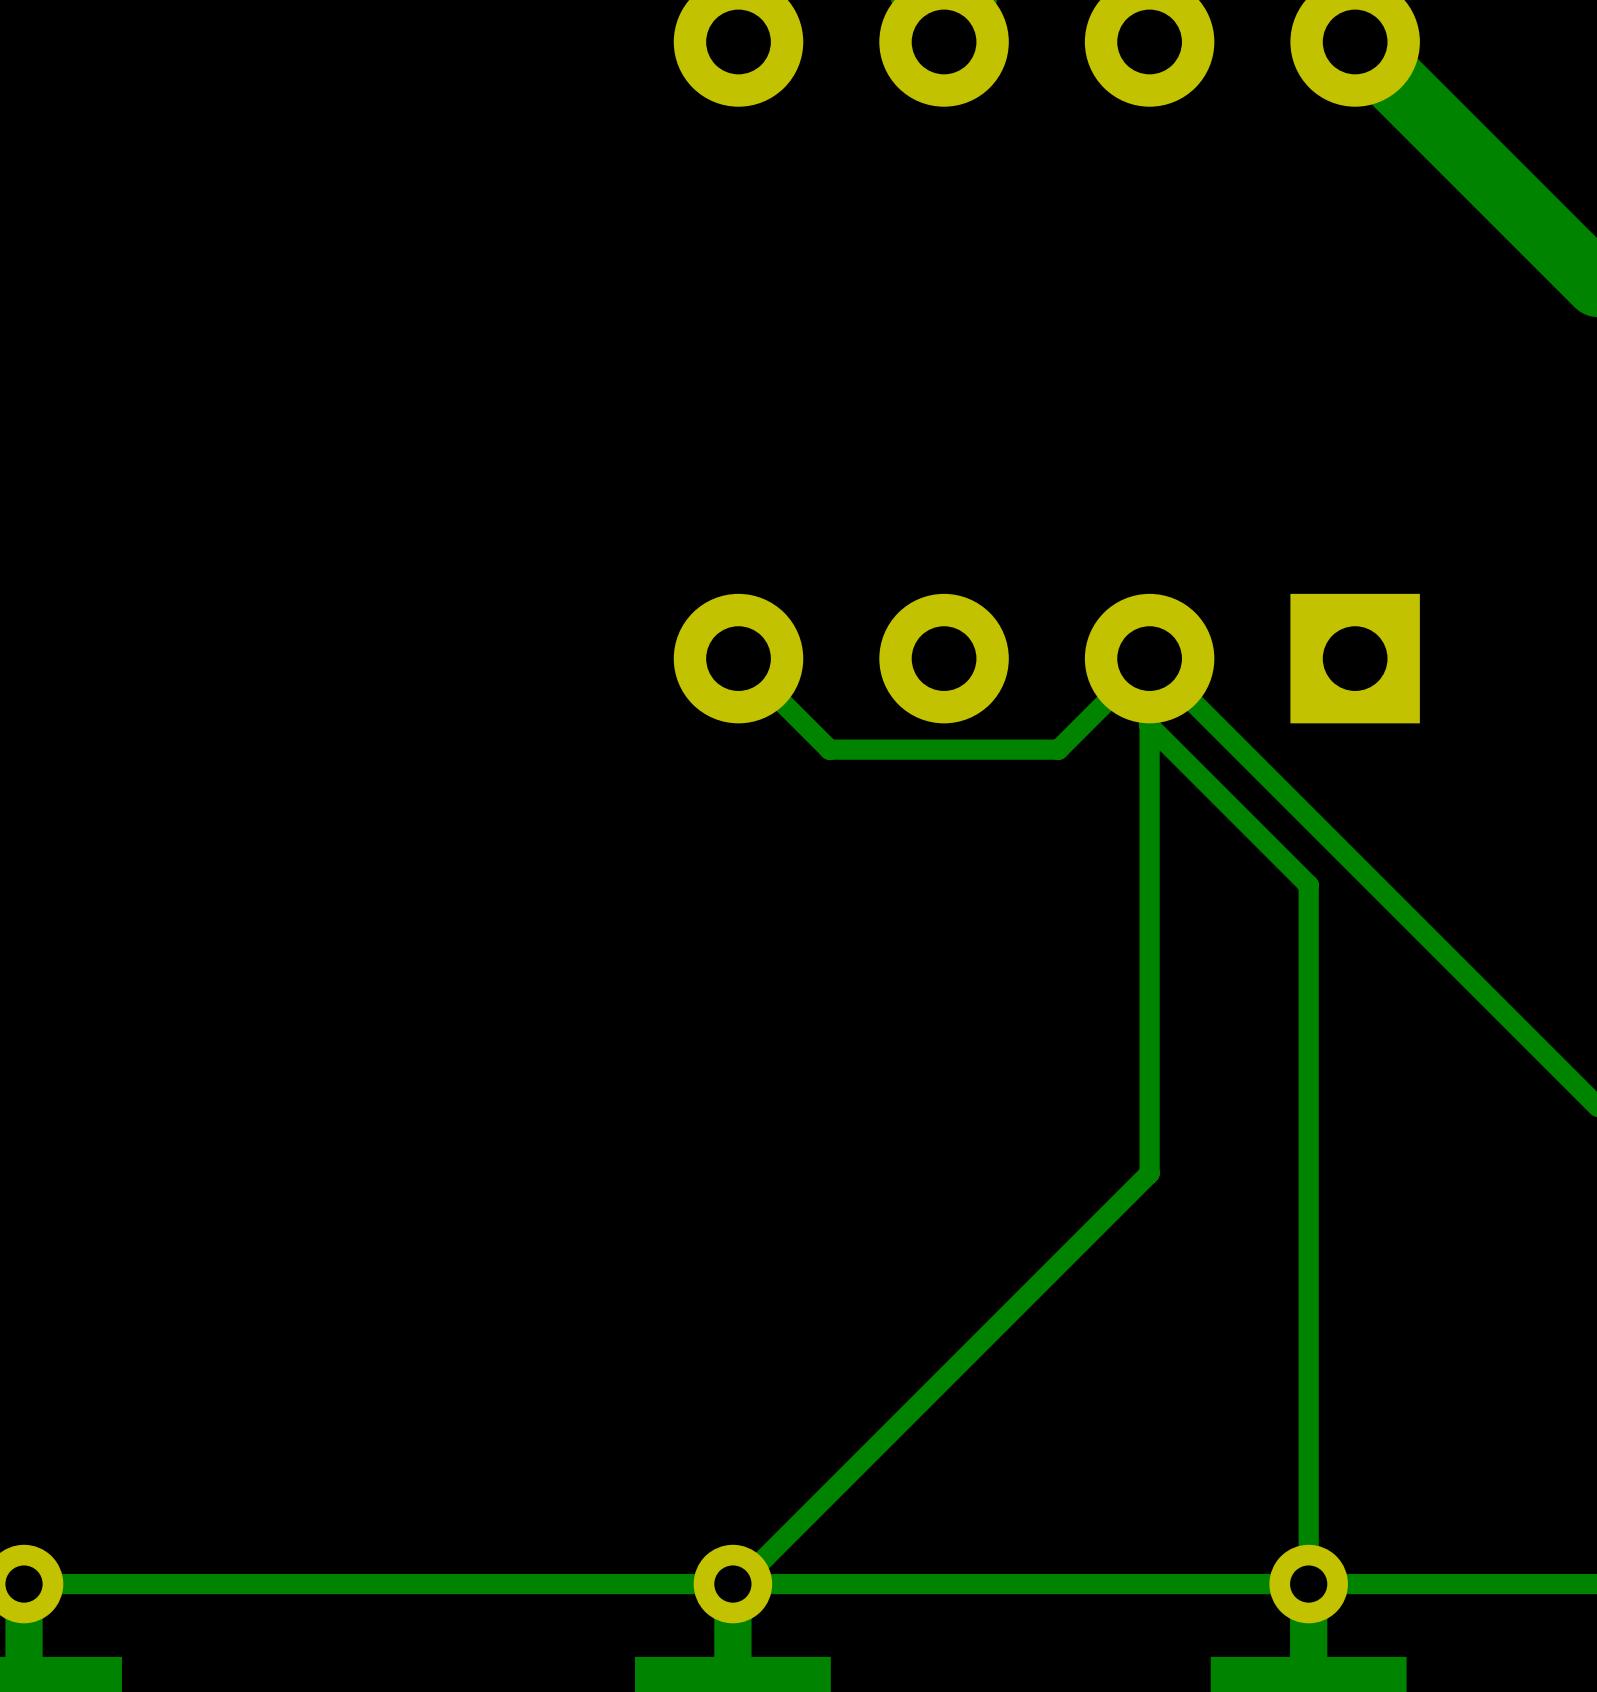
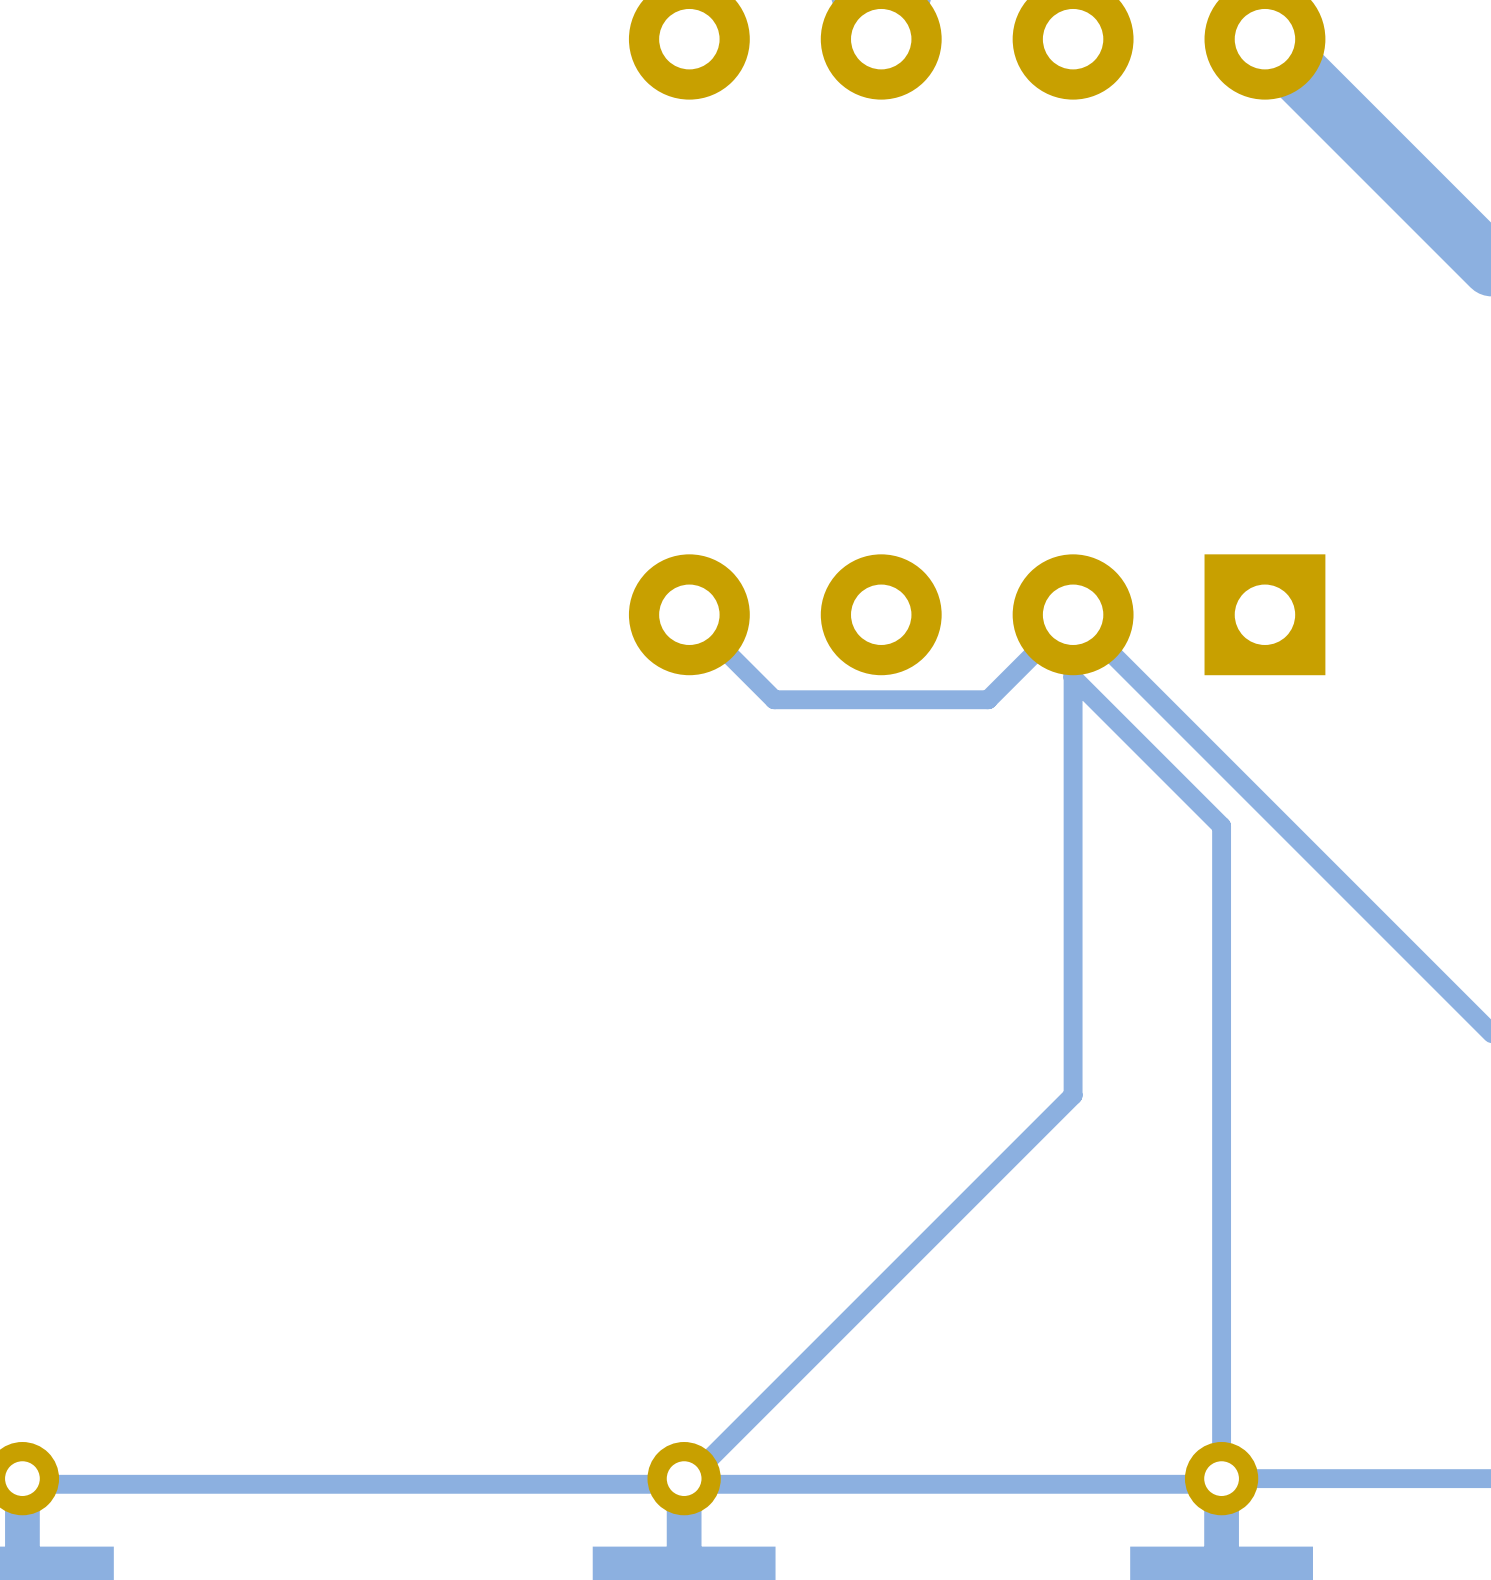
track: (1308, 1584) (24, 1584) -> none
track: none -> (1215, 1484) (22, 1484)

